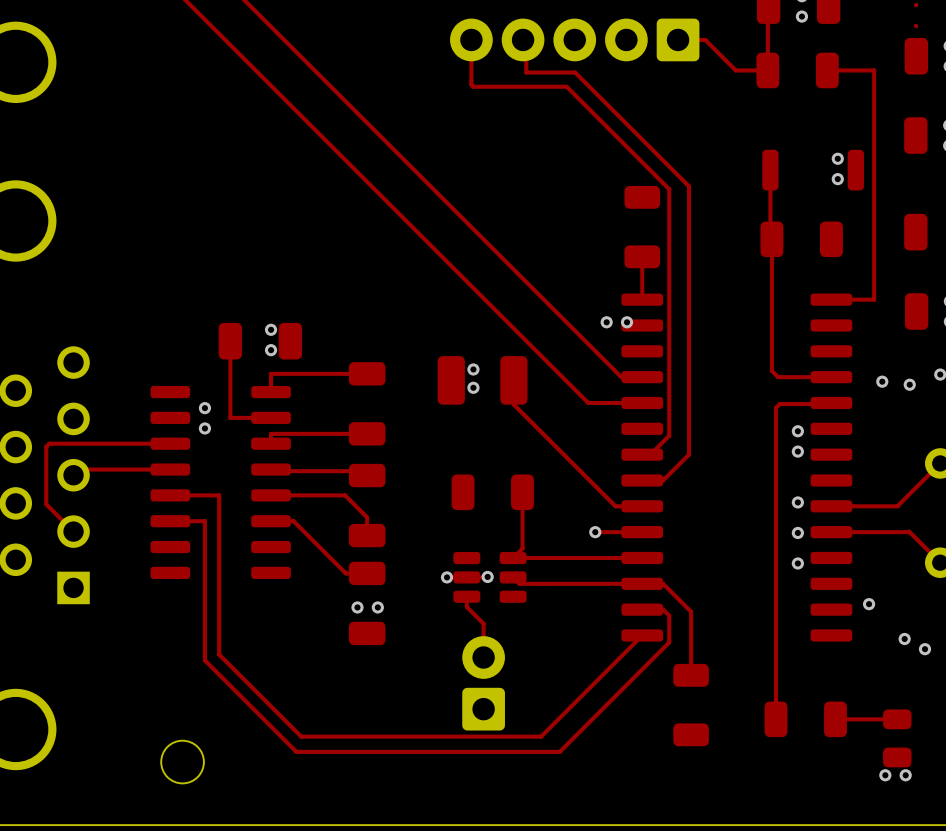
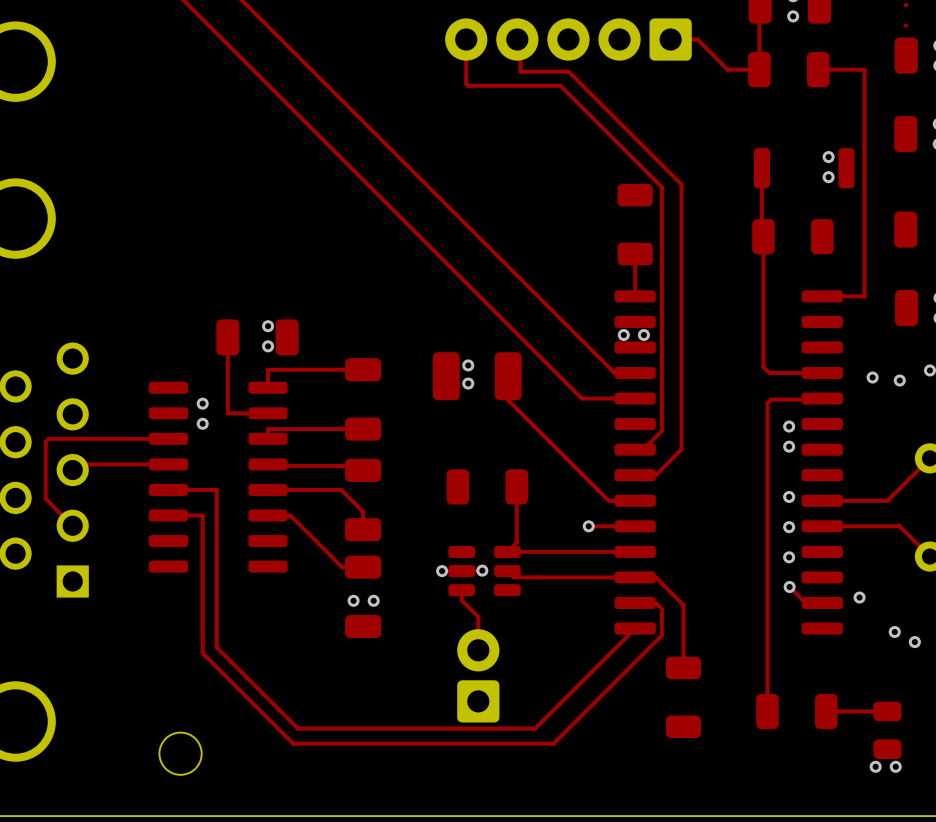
via: (606, 322) -> none
via: (627, 322) -> none
via: none -> (623, 335)
via: none -> (643, 335)
top track: none -> (789, 586) (805, 602)
via: none -> (789, 586)

